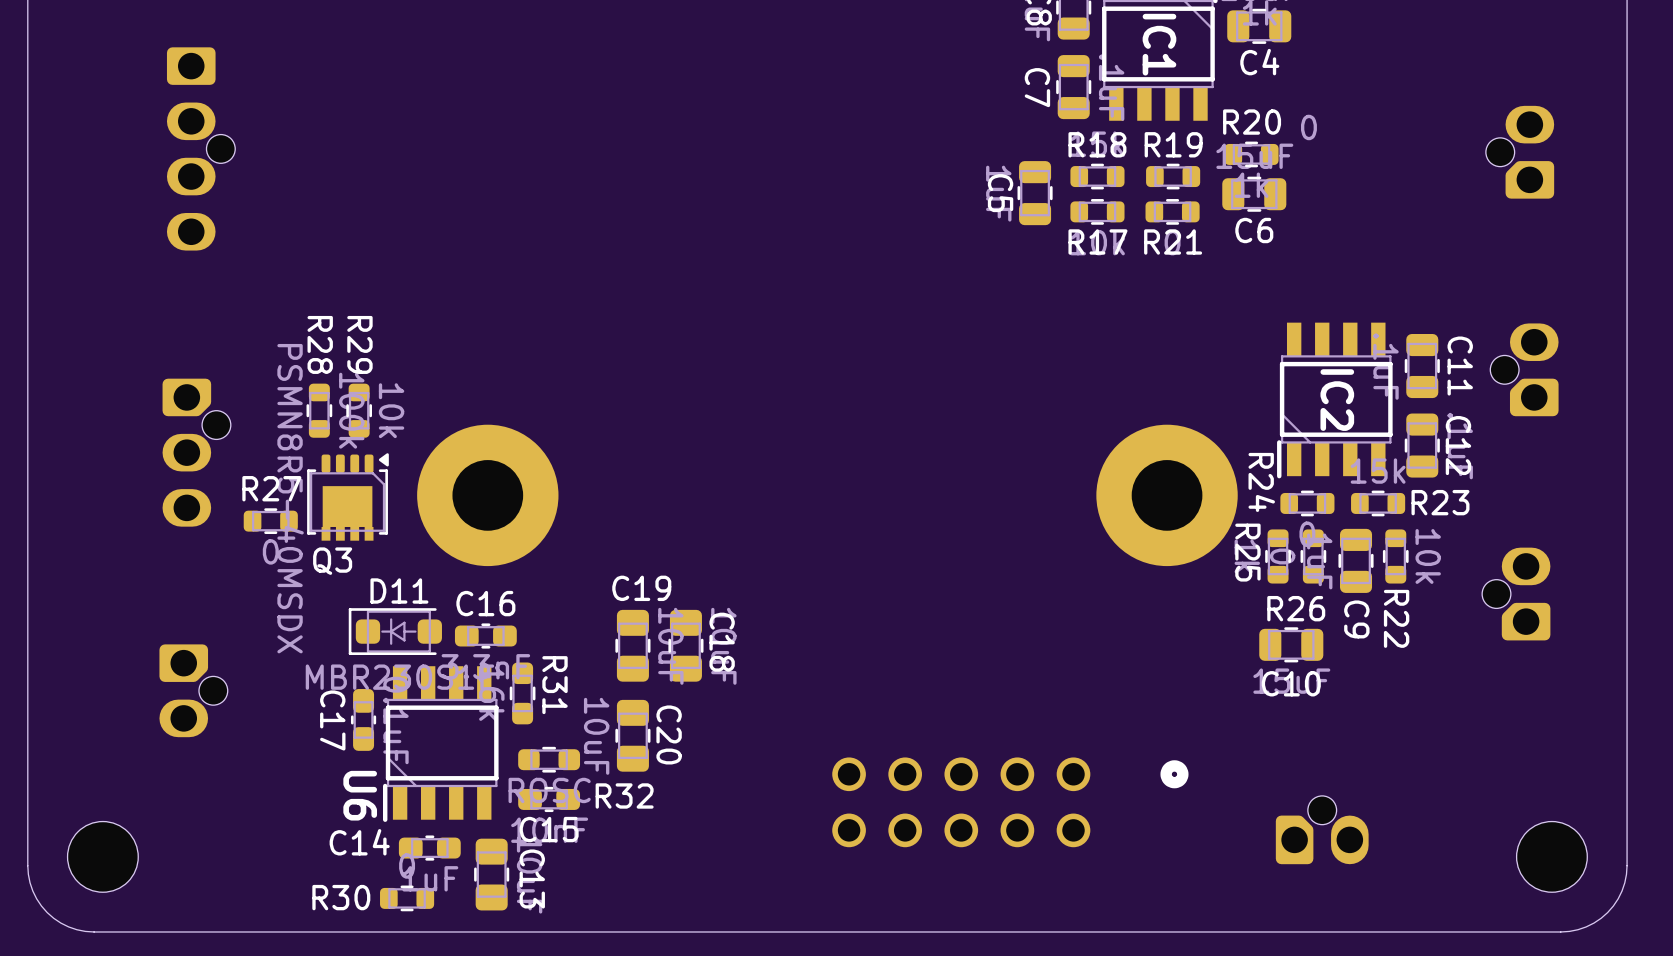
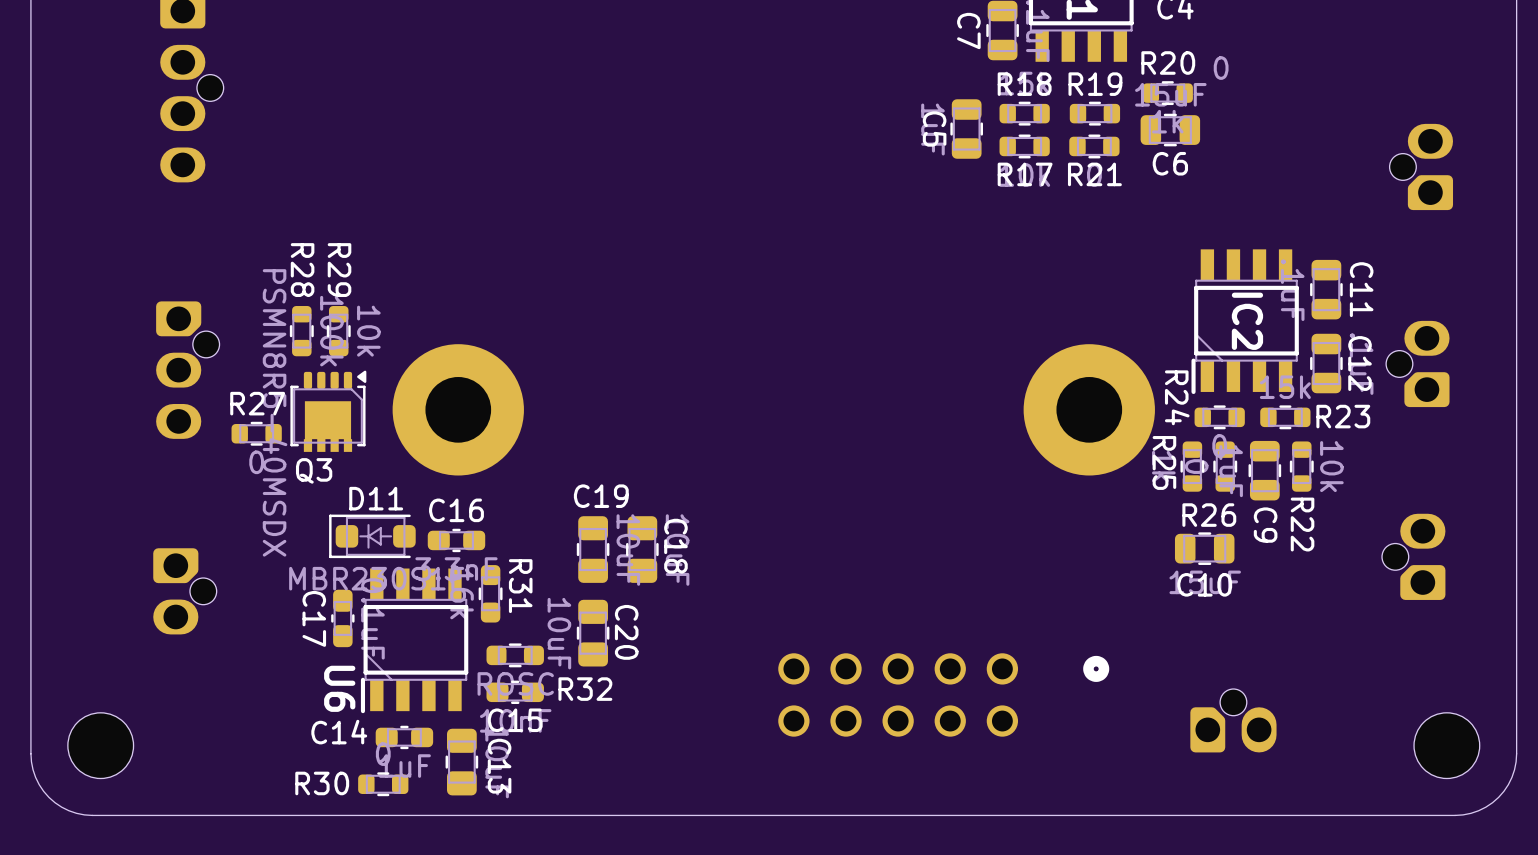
part: (1520, 152) -> none
part: none -> (1421, 166)
part: (1524, 369) -> none
part: none -> (1417, 363)
part position: (1516, 594) -> (1413, 556)

